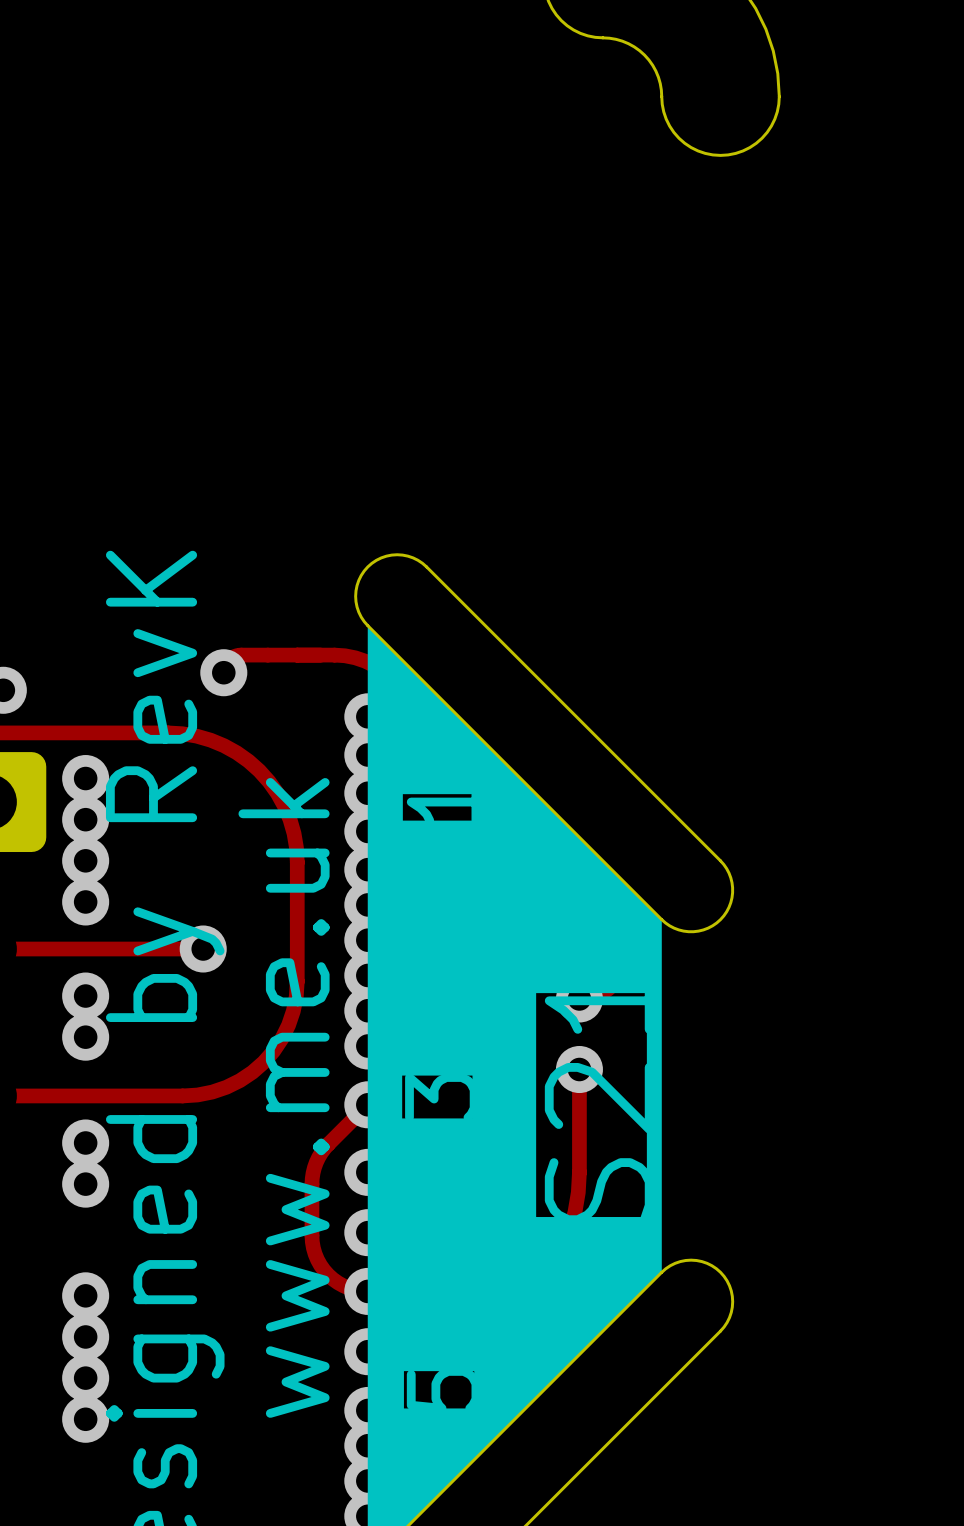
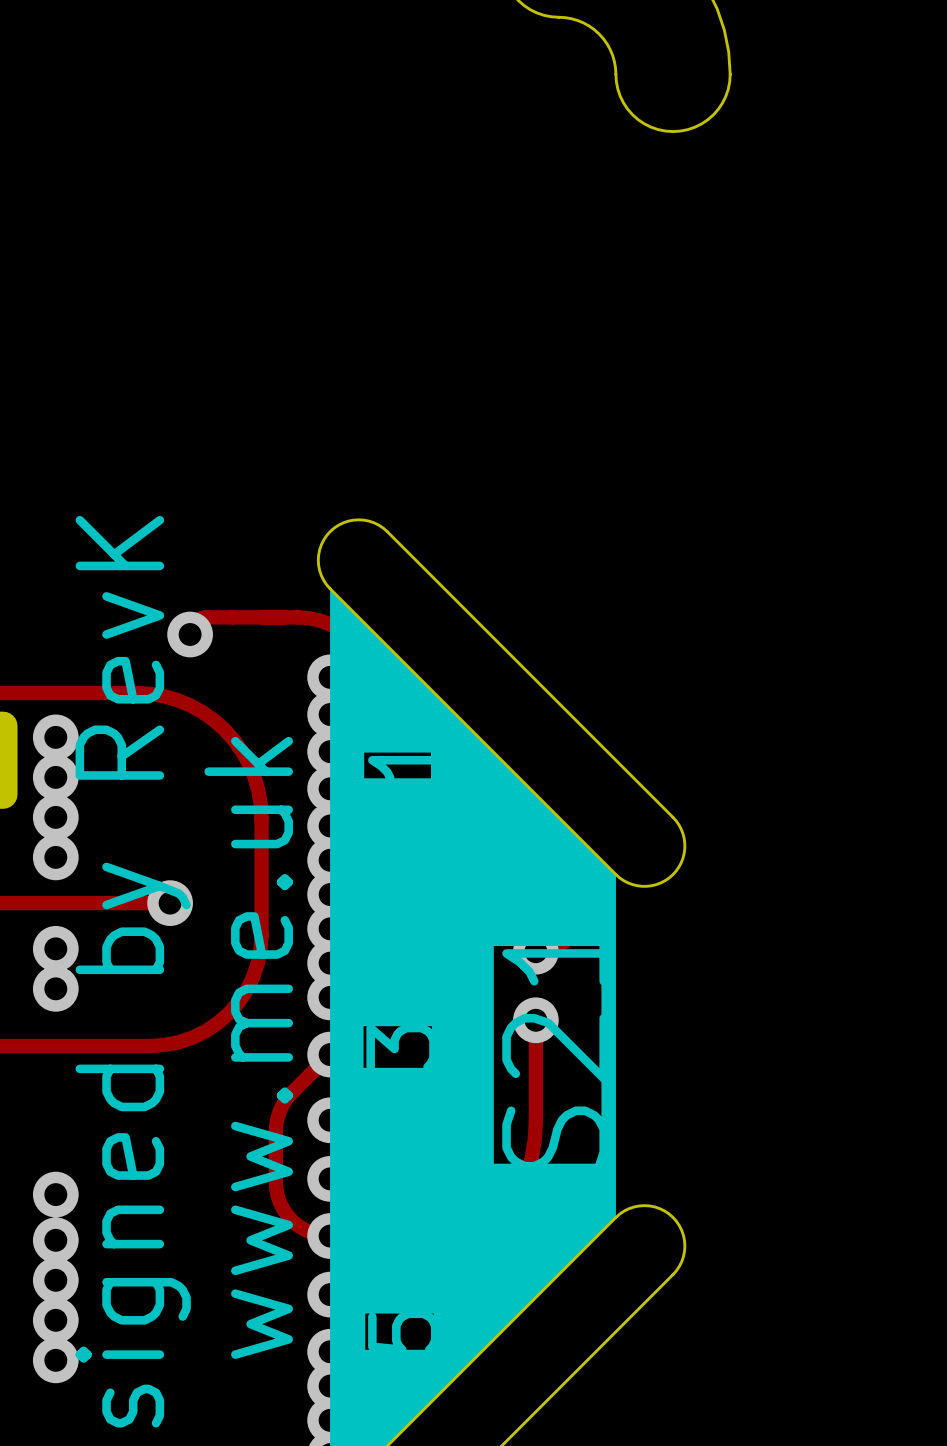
via: (85, 1142) -> none
via: (85, 1184) -> none
via: none -> (55, 1194)

